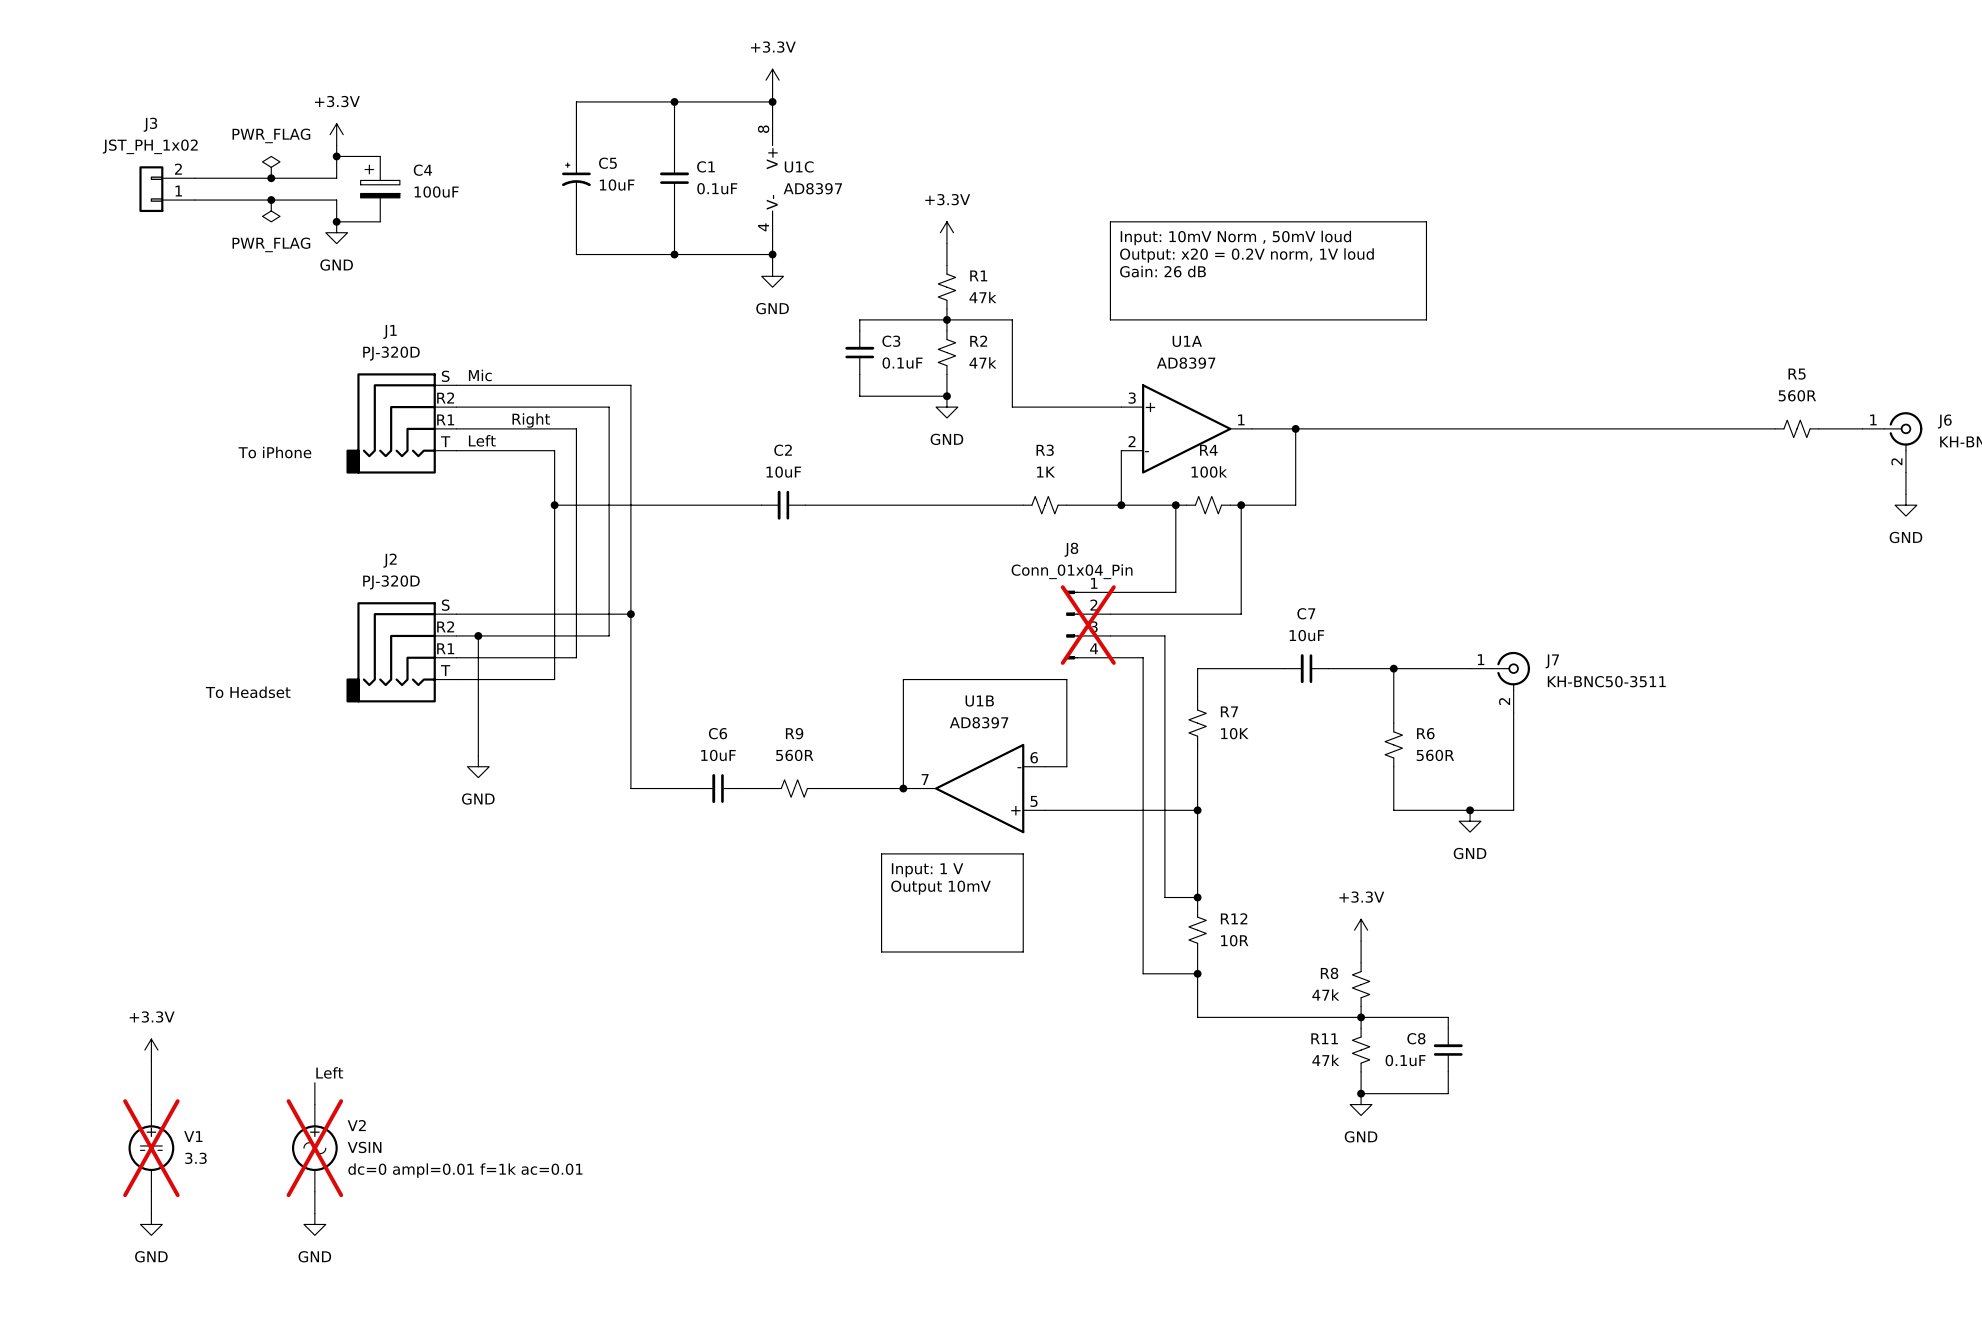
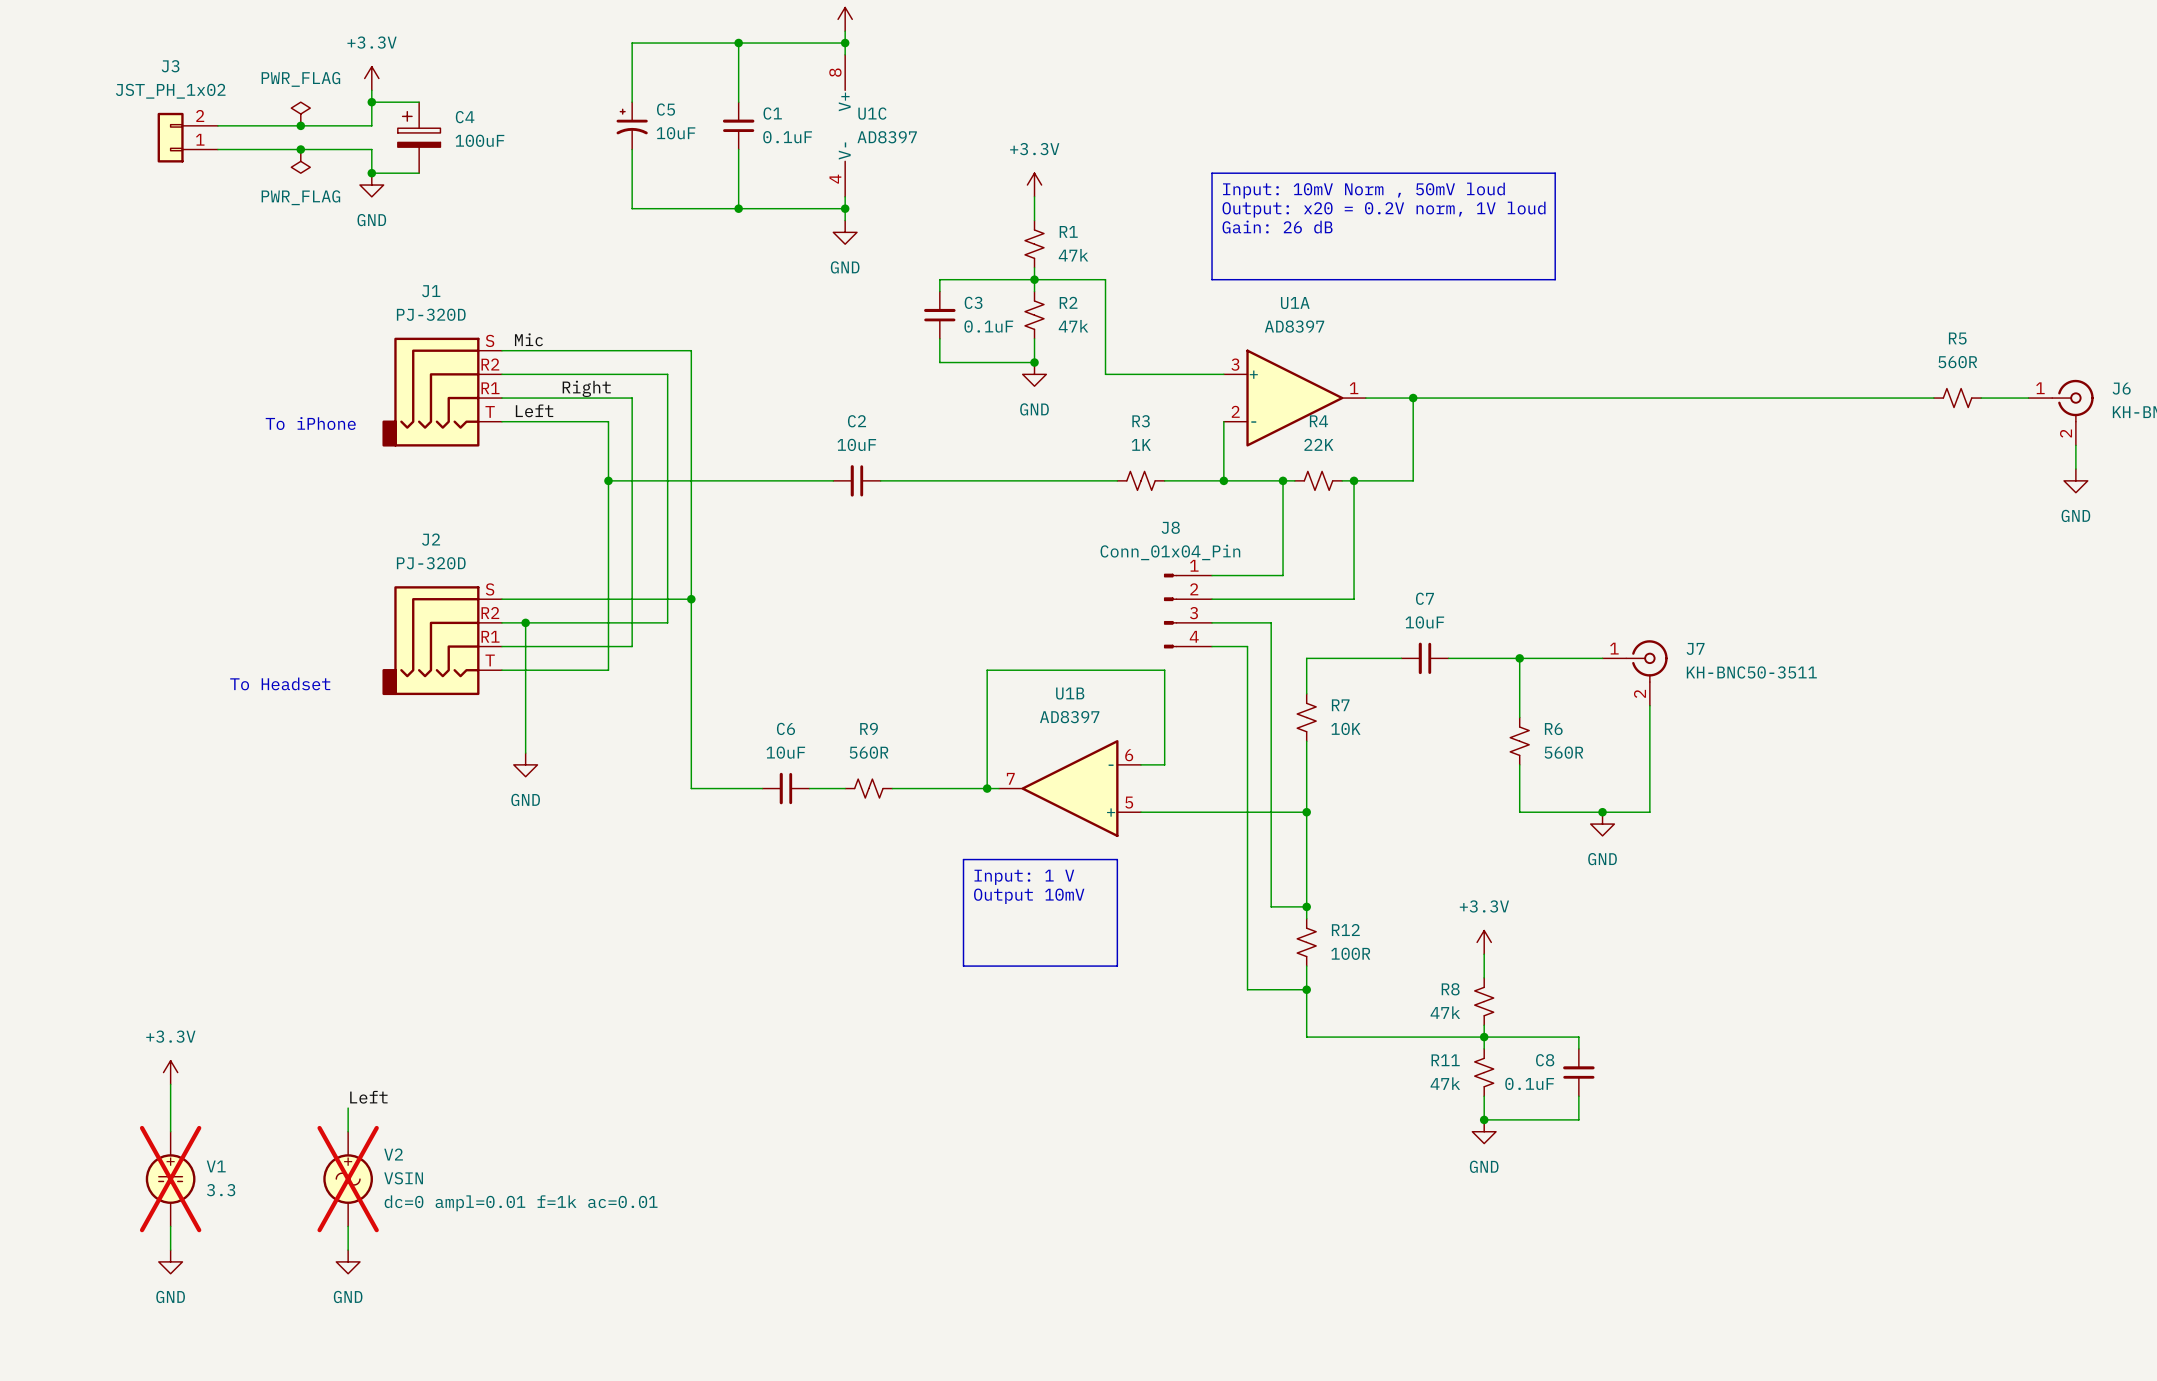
R4 value: 100k (1209, 471) -> 22K (1318, 444)
J8 do-not-place cross: (1088, 625) -> none
R12 value: 10R (1234, 940) -> 100R (1350, 953)

